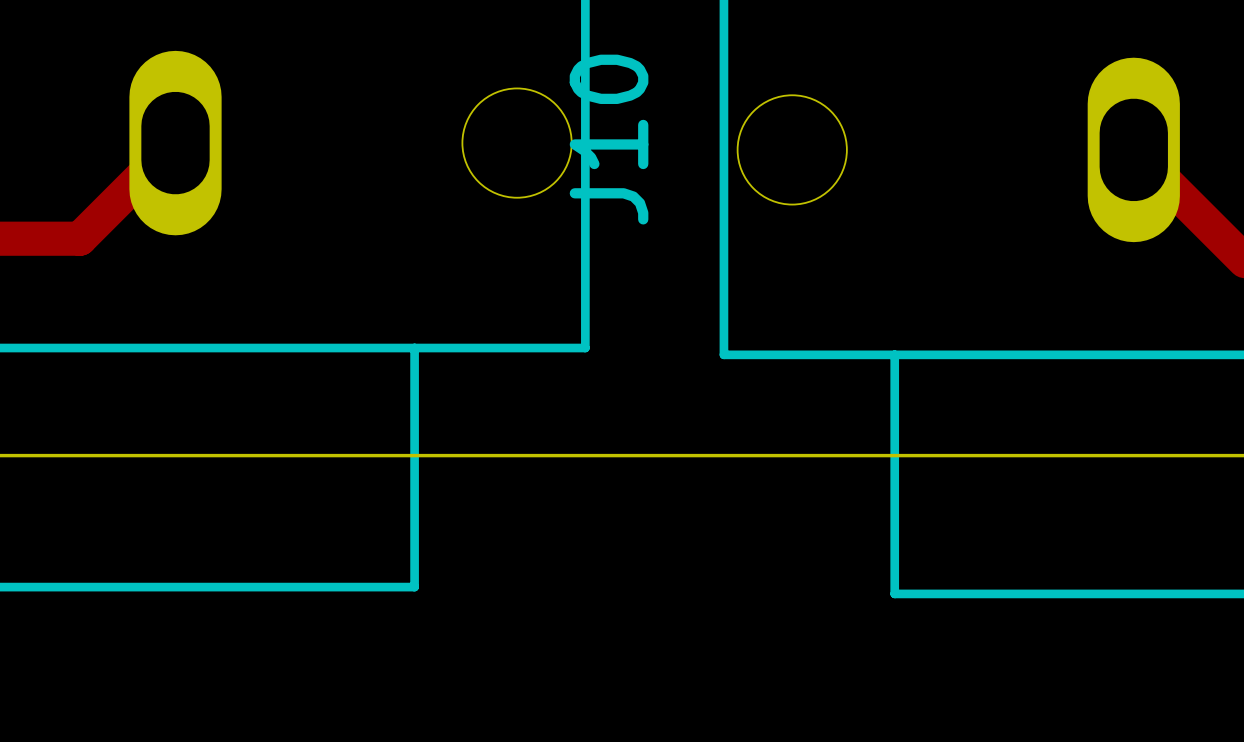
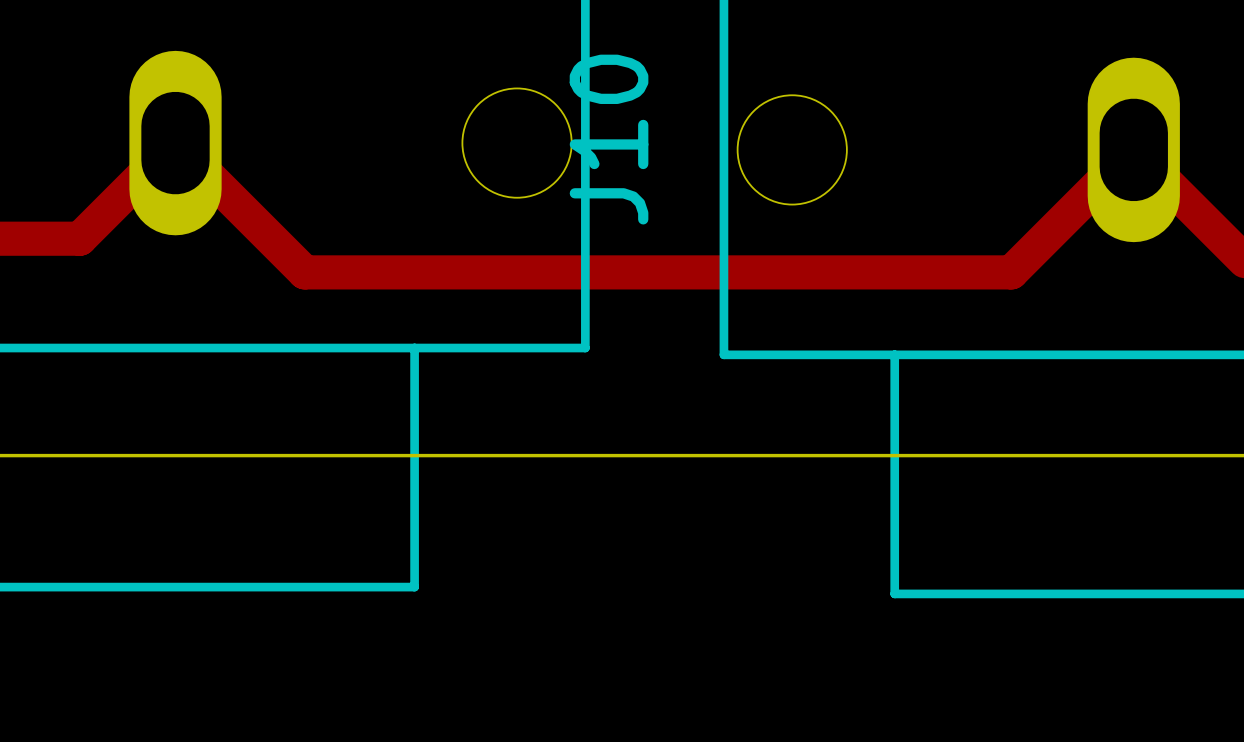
track: none -> (175, 143) (304, 272) (1011, 272) (1133, 149)

